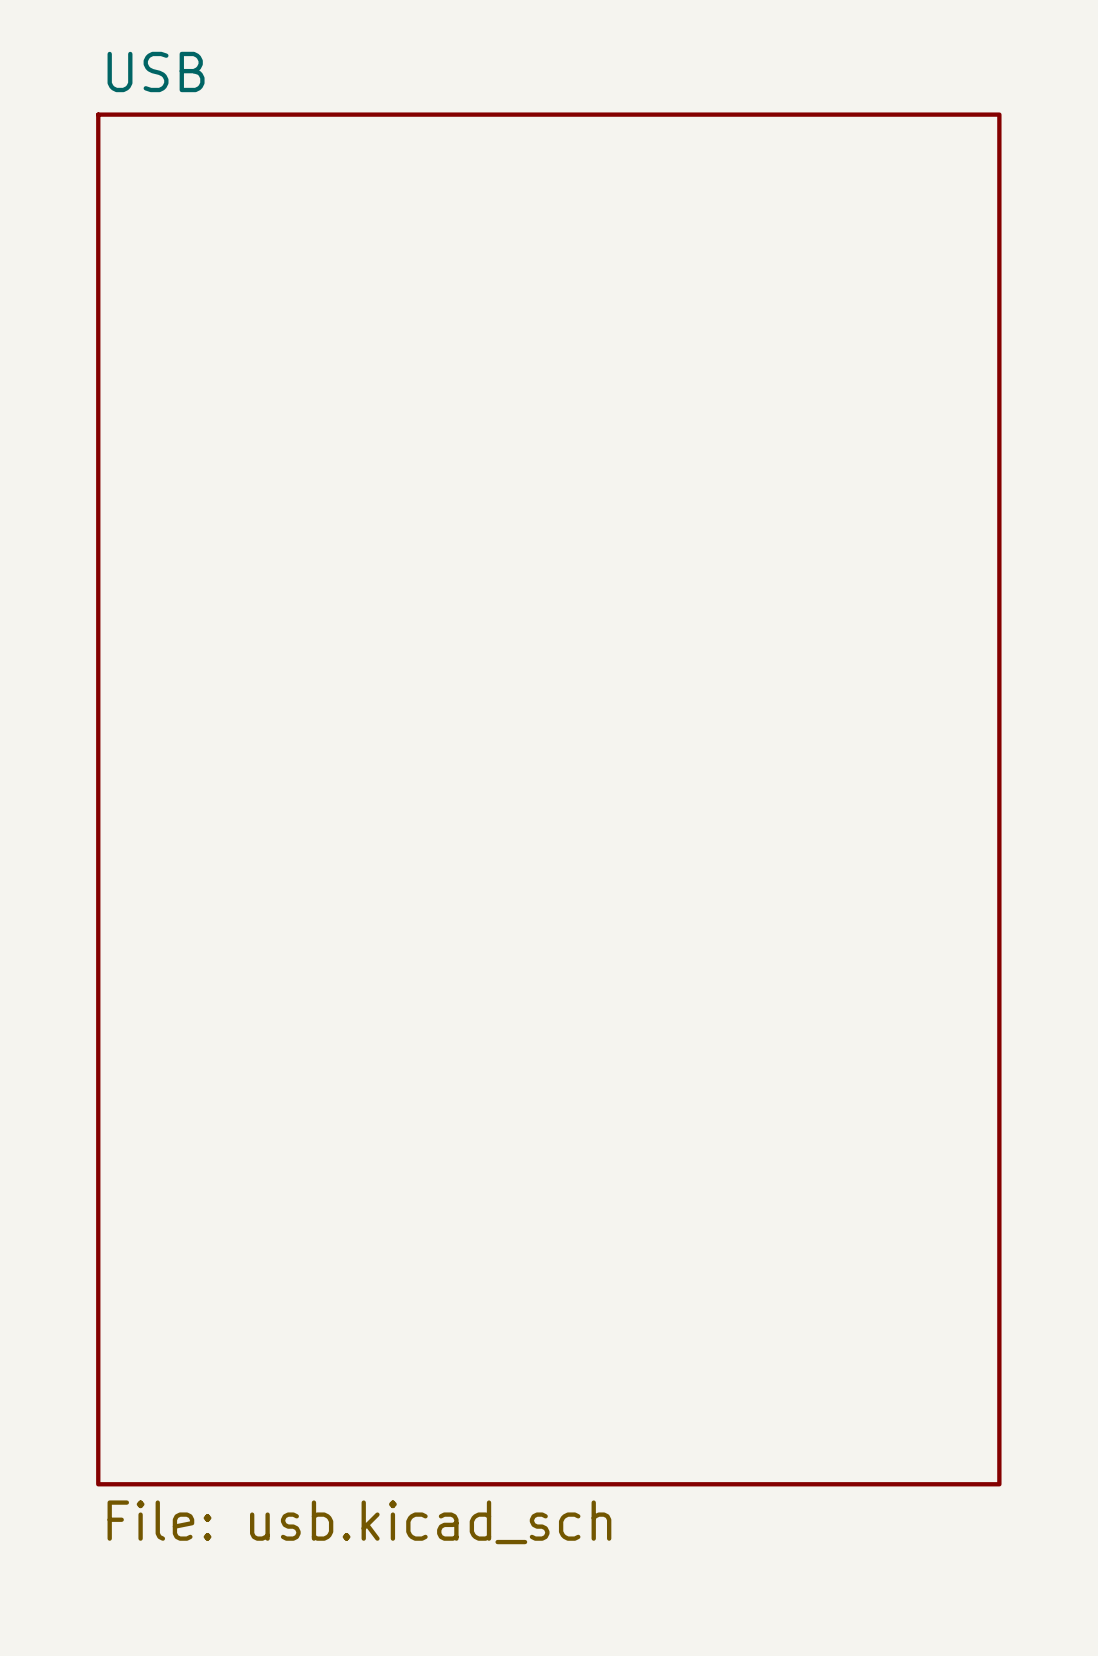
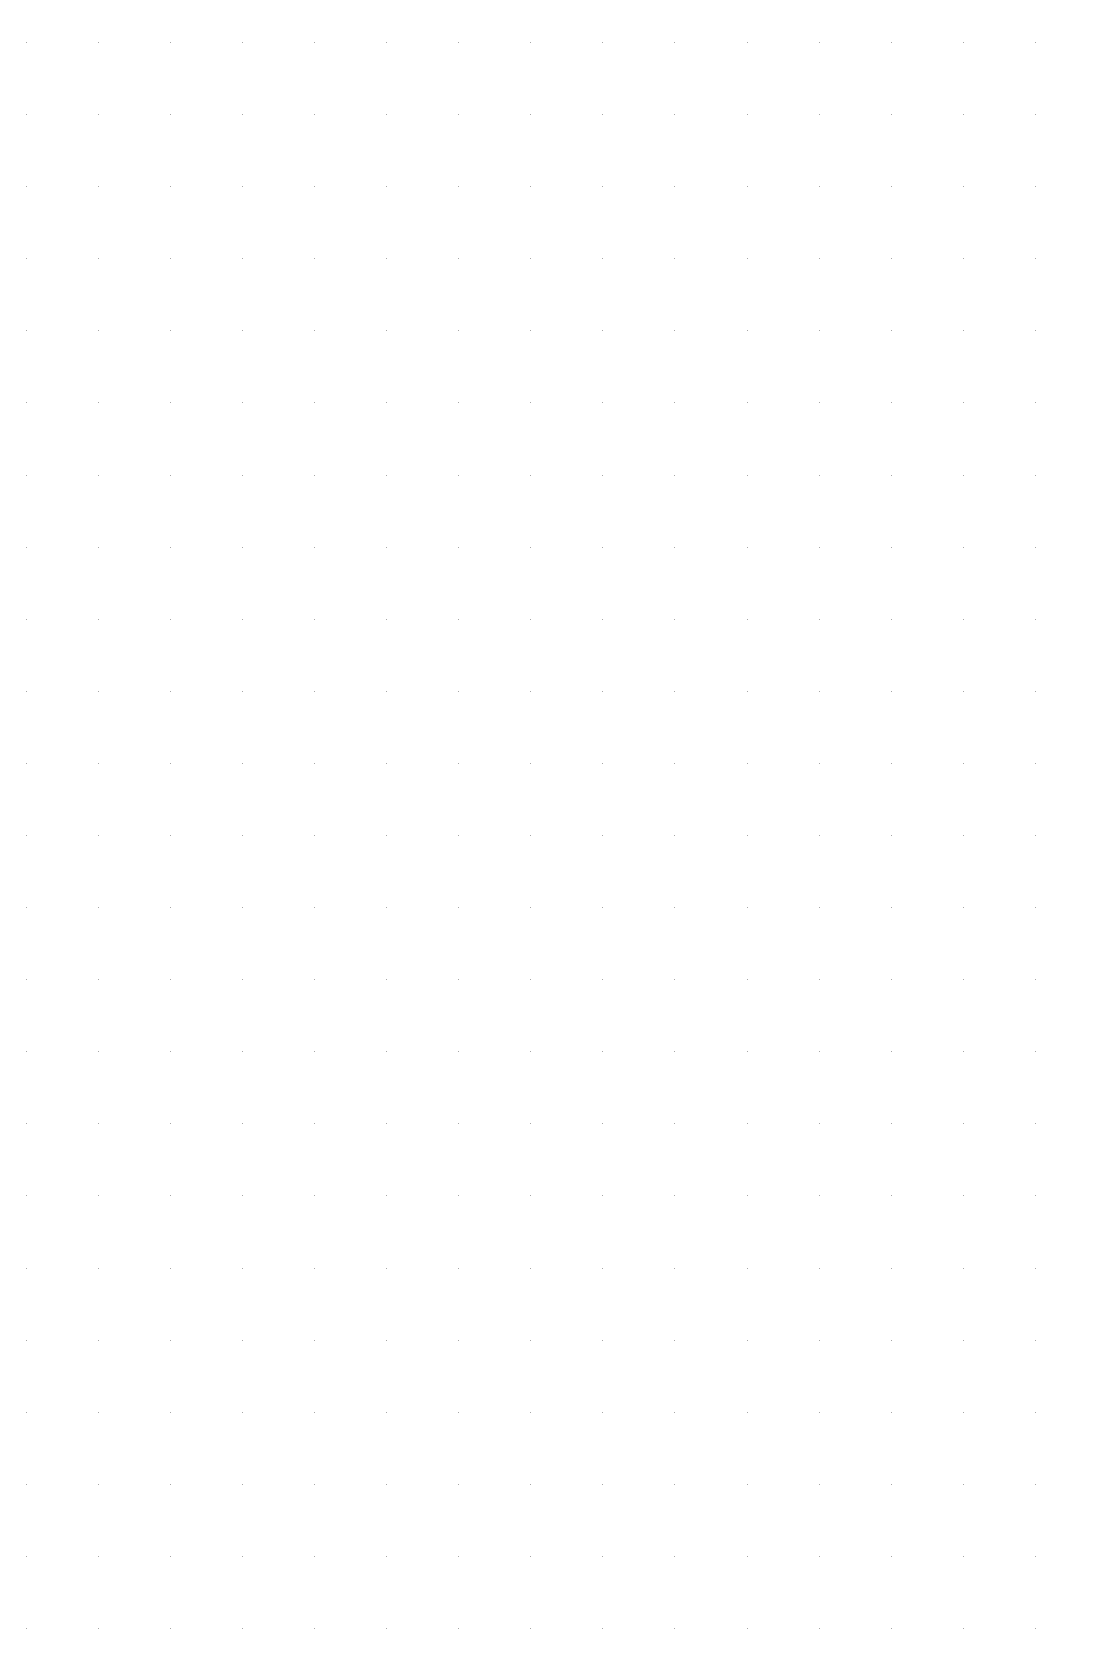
sheet USB: File: usb.kicad_sch (548, 799) -> none

